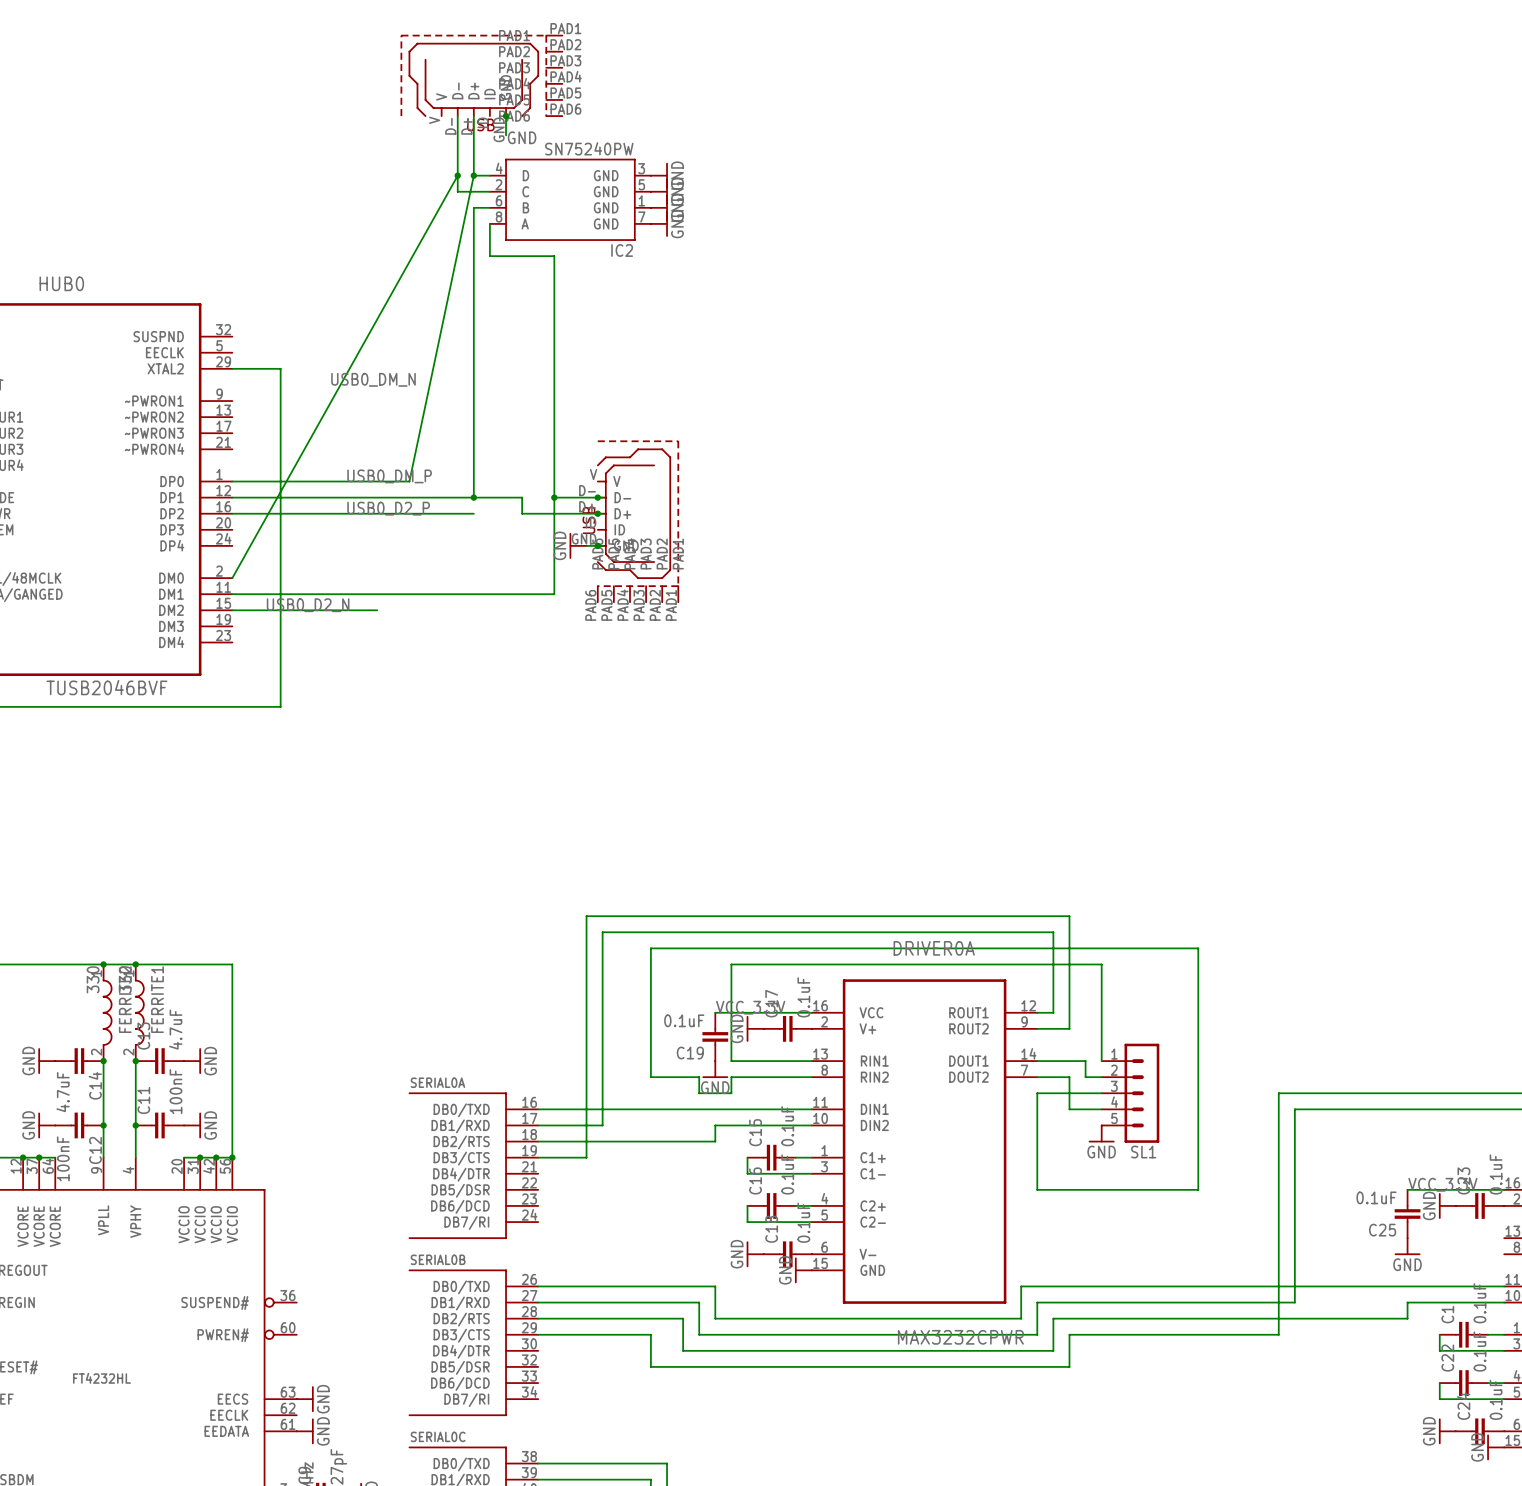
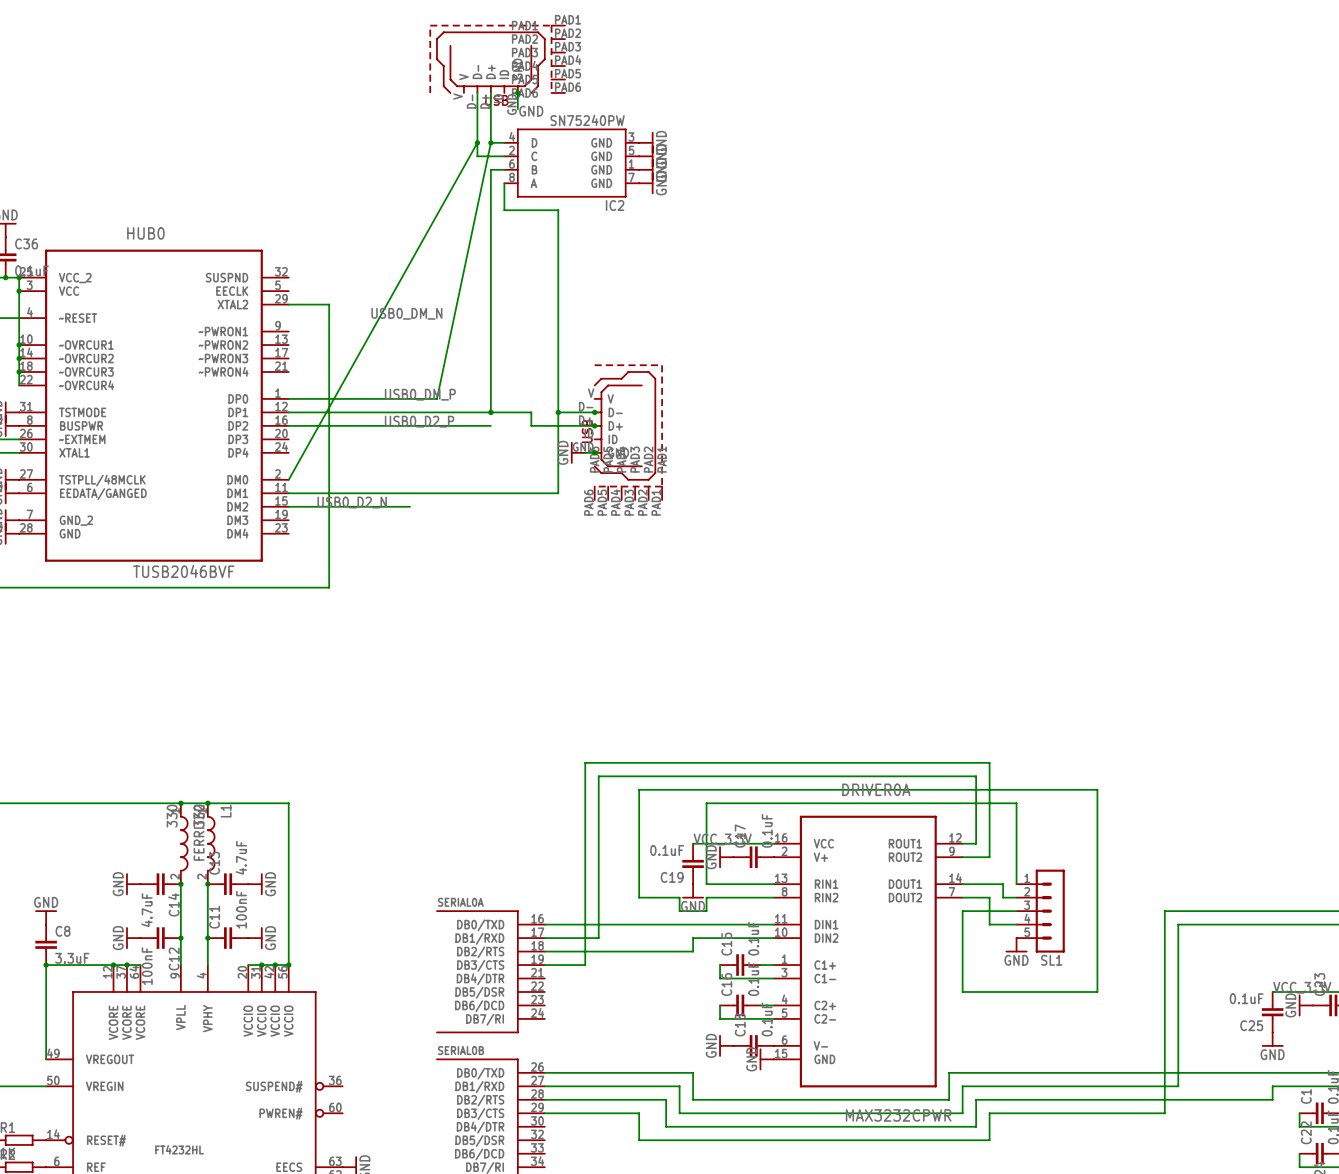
FERRITE1 name: FERRITE1 (157, 999) -> L1 (226, 811)

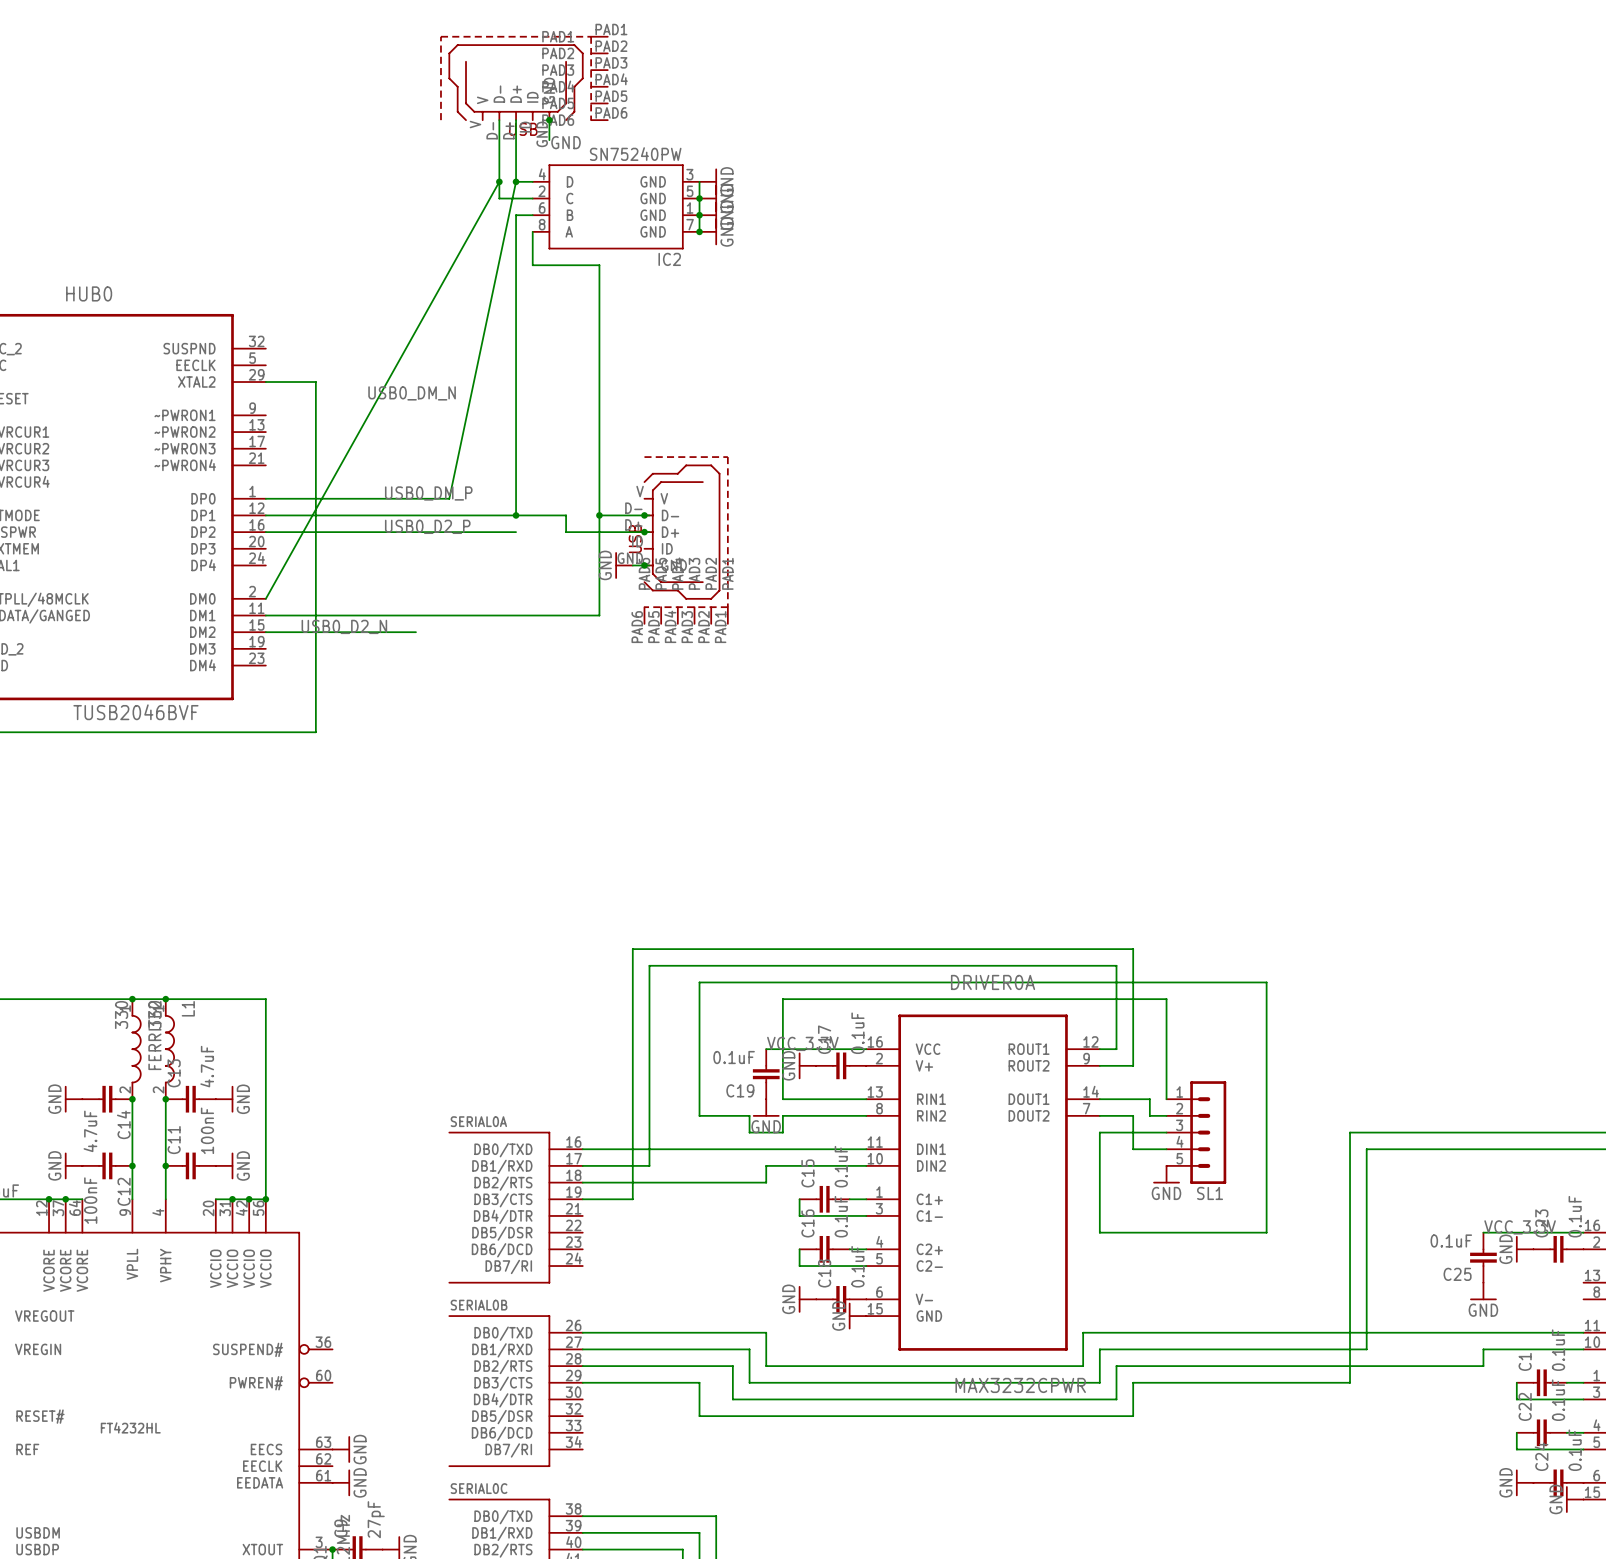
wire: none -> (699, 181) (699, 231)
junction: none -> (699, 198)
junction: none -> (699, 215)
junction: none -> (699, 231)

